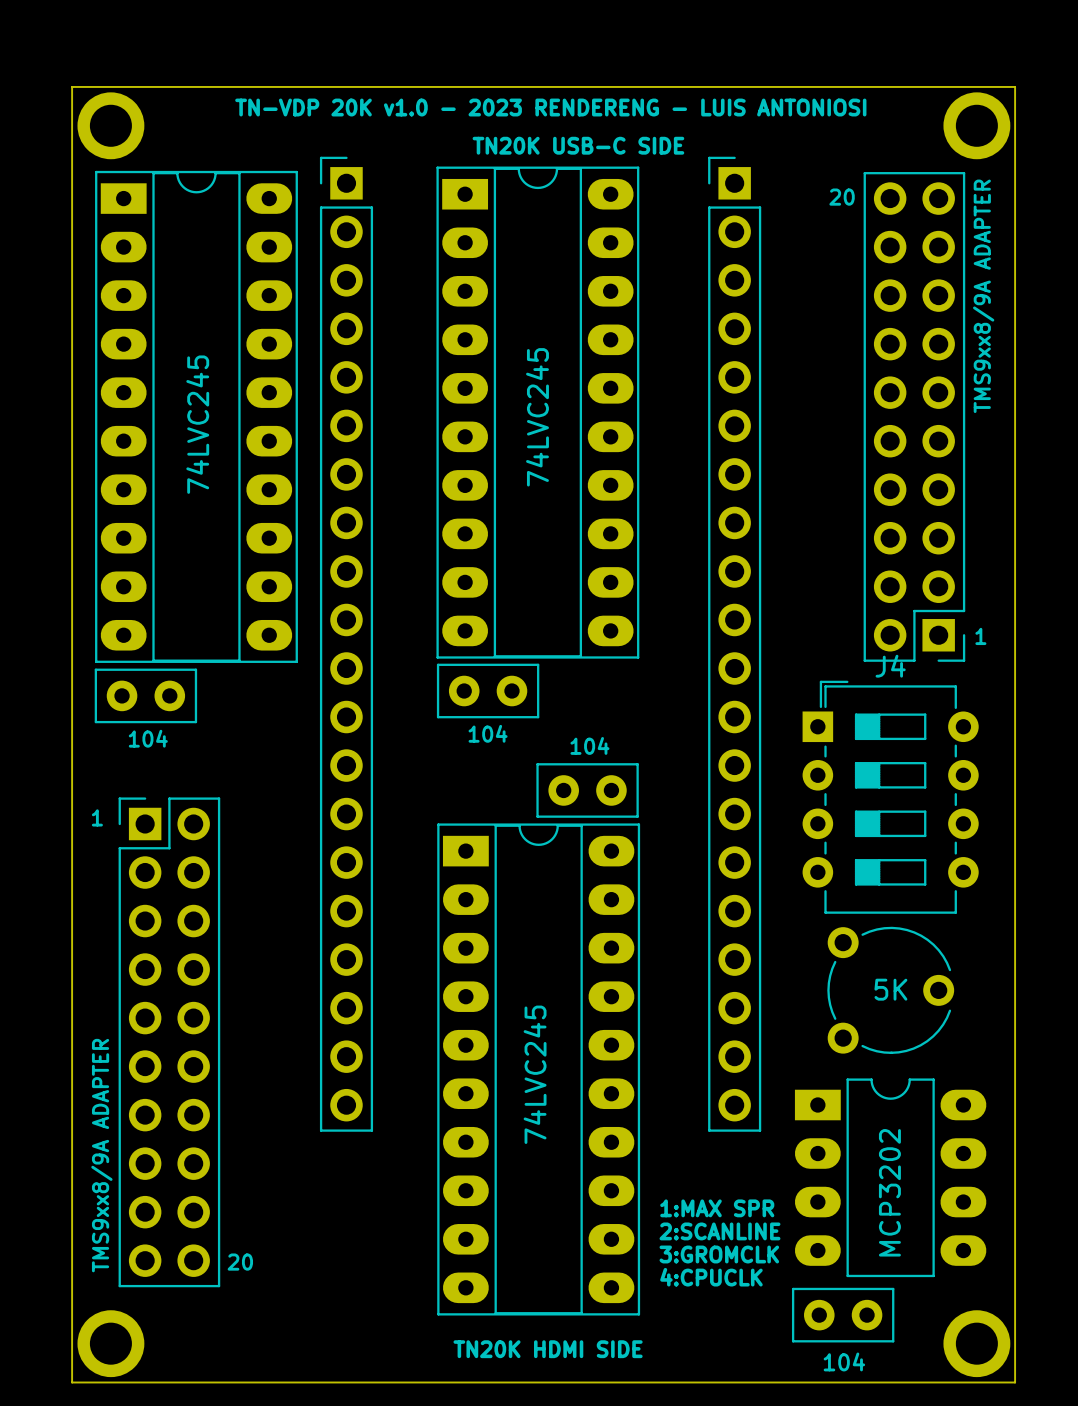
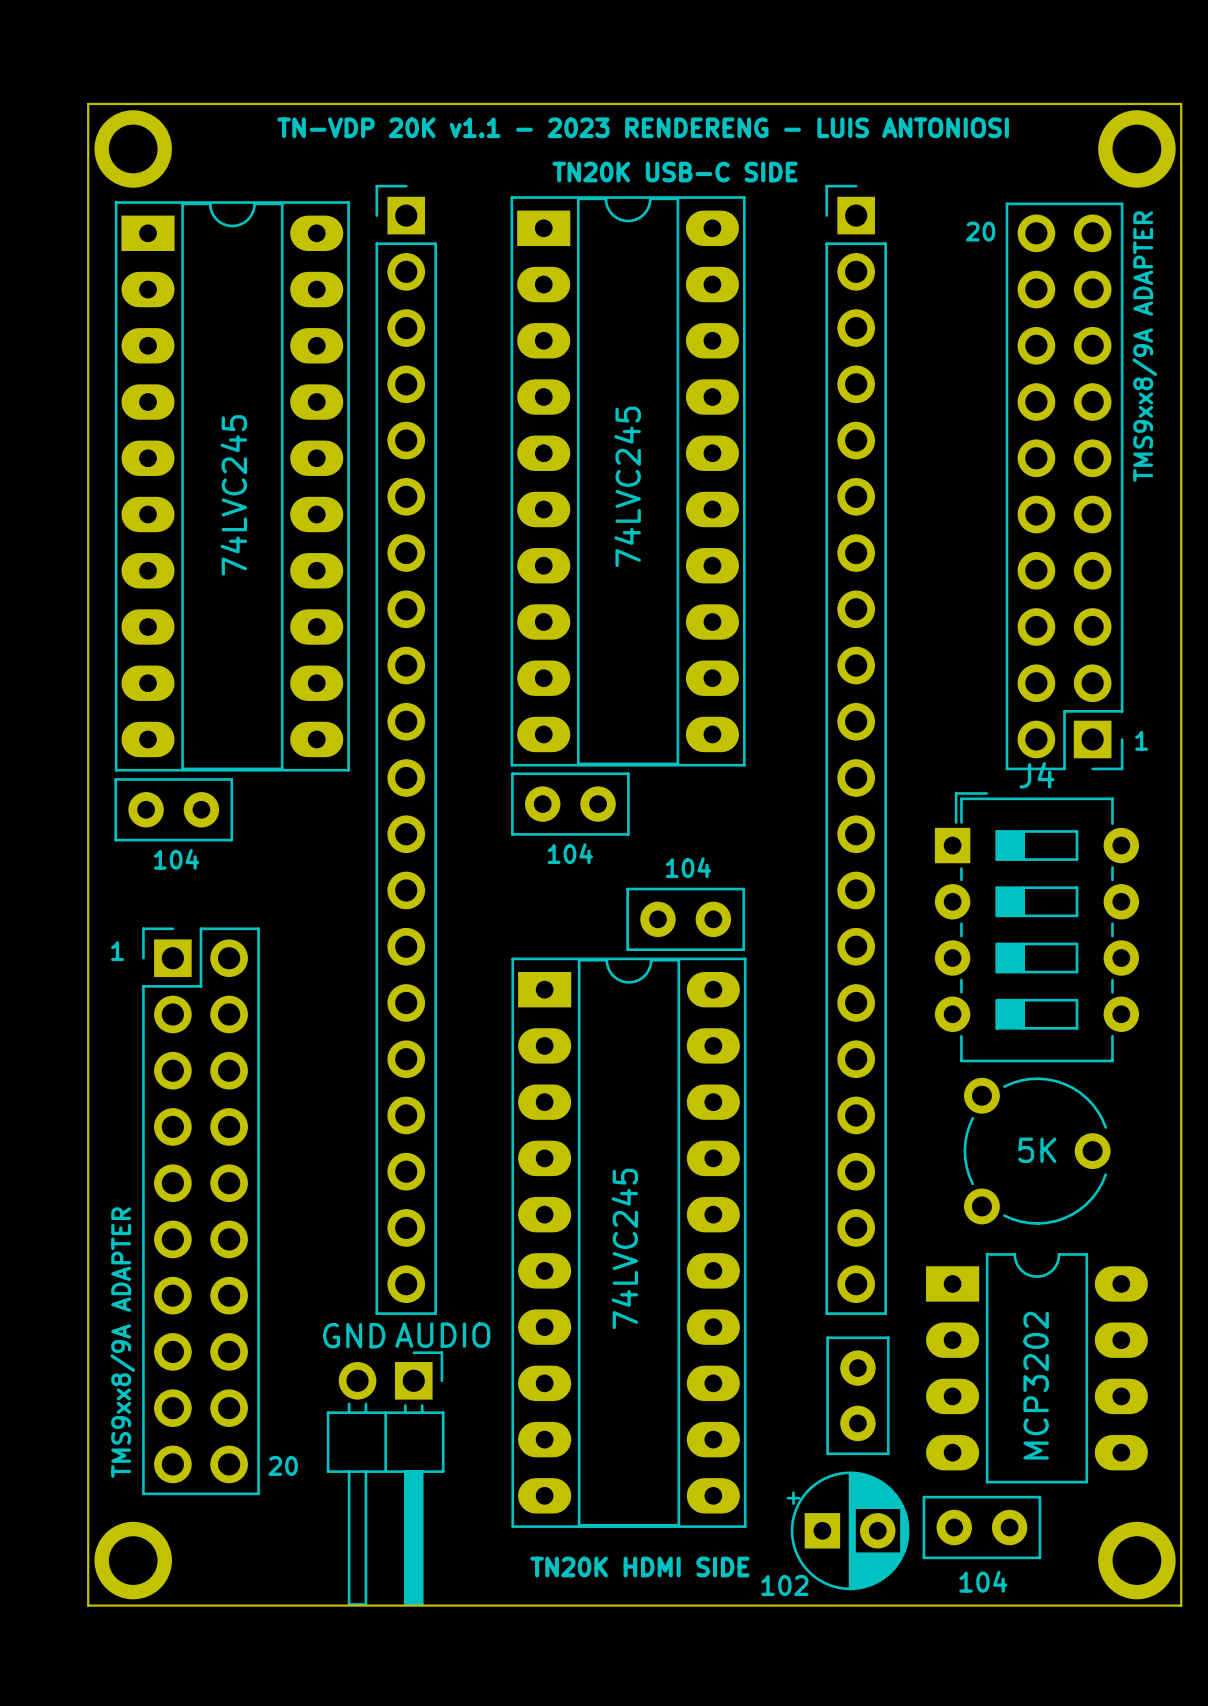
text: TN-VDP 20K v1.0 - 2023 RENDERENG - LUIS ANTONIOSI (550, 107) -> TN-VDP 20K v1.1 - 2023 RENDERENG - LUIS ANTONIOSI (643, 127)
part: none -> (857, 1395)
text: 1:MAX SPR (717, 1208) -> none
text: 2:SCANLINE (719, 1231) -> none
text: 3:GROMCLK (719, 1254) -> none
part: none -> (385, 1478)
text: 4:CPUCLK (711, 1277) -> none
part: none -> (848, 1530)

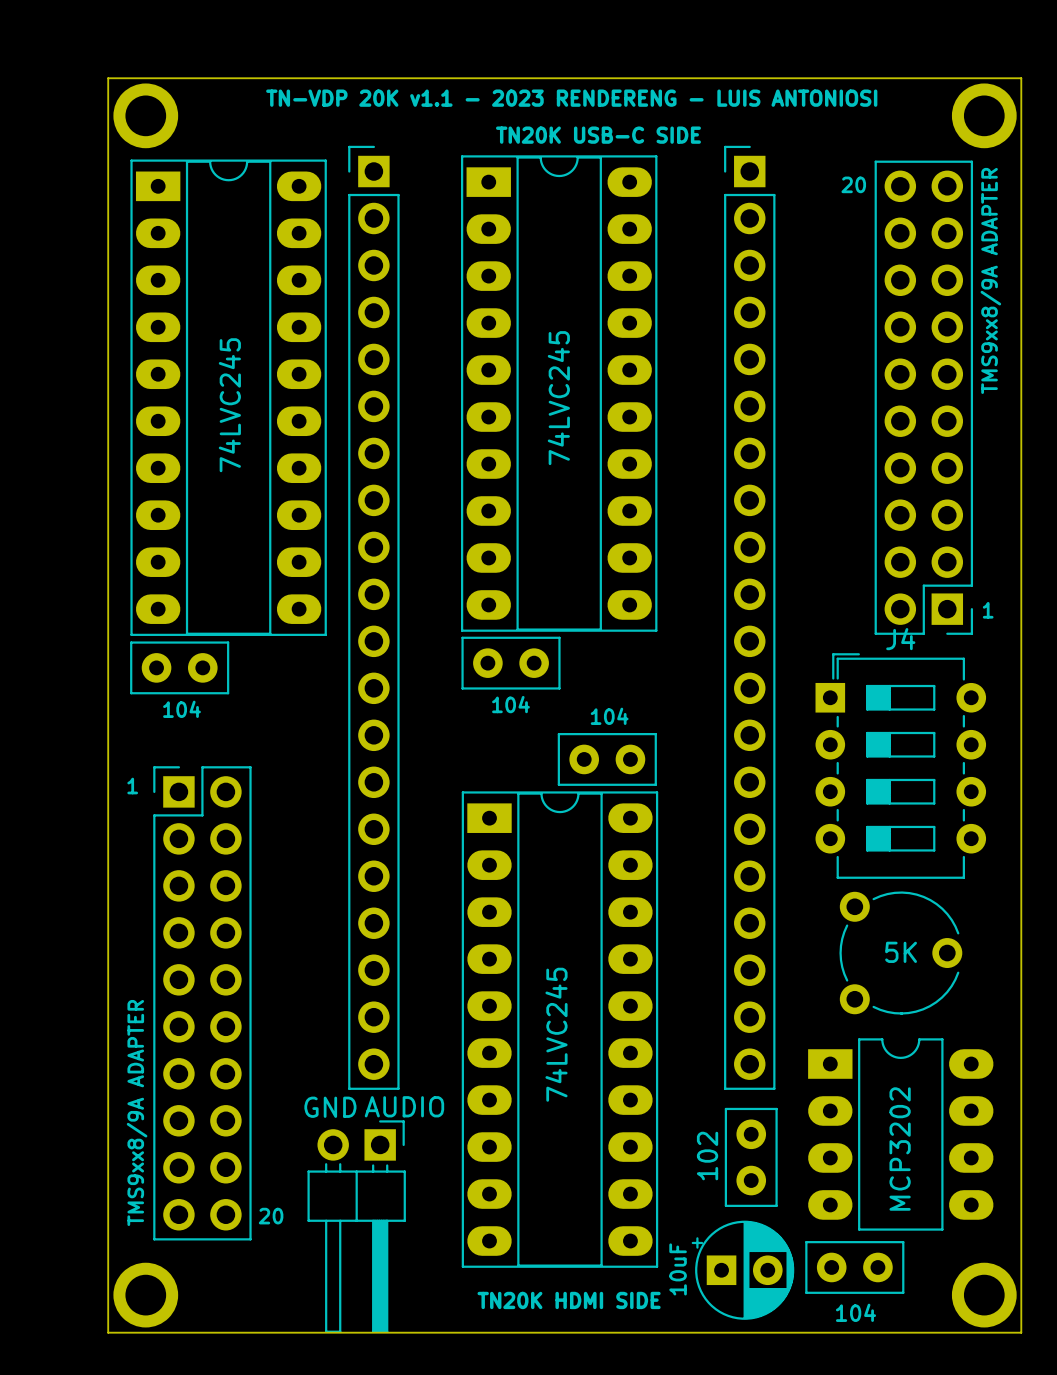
part value: none -> 102 (707, 1156)
part value: none -> 10uF (678, 1269)
part text: 102 (784, 1585) -> none

